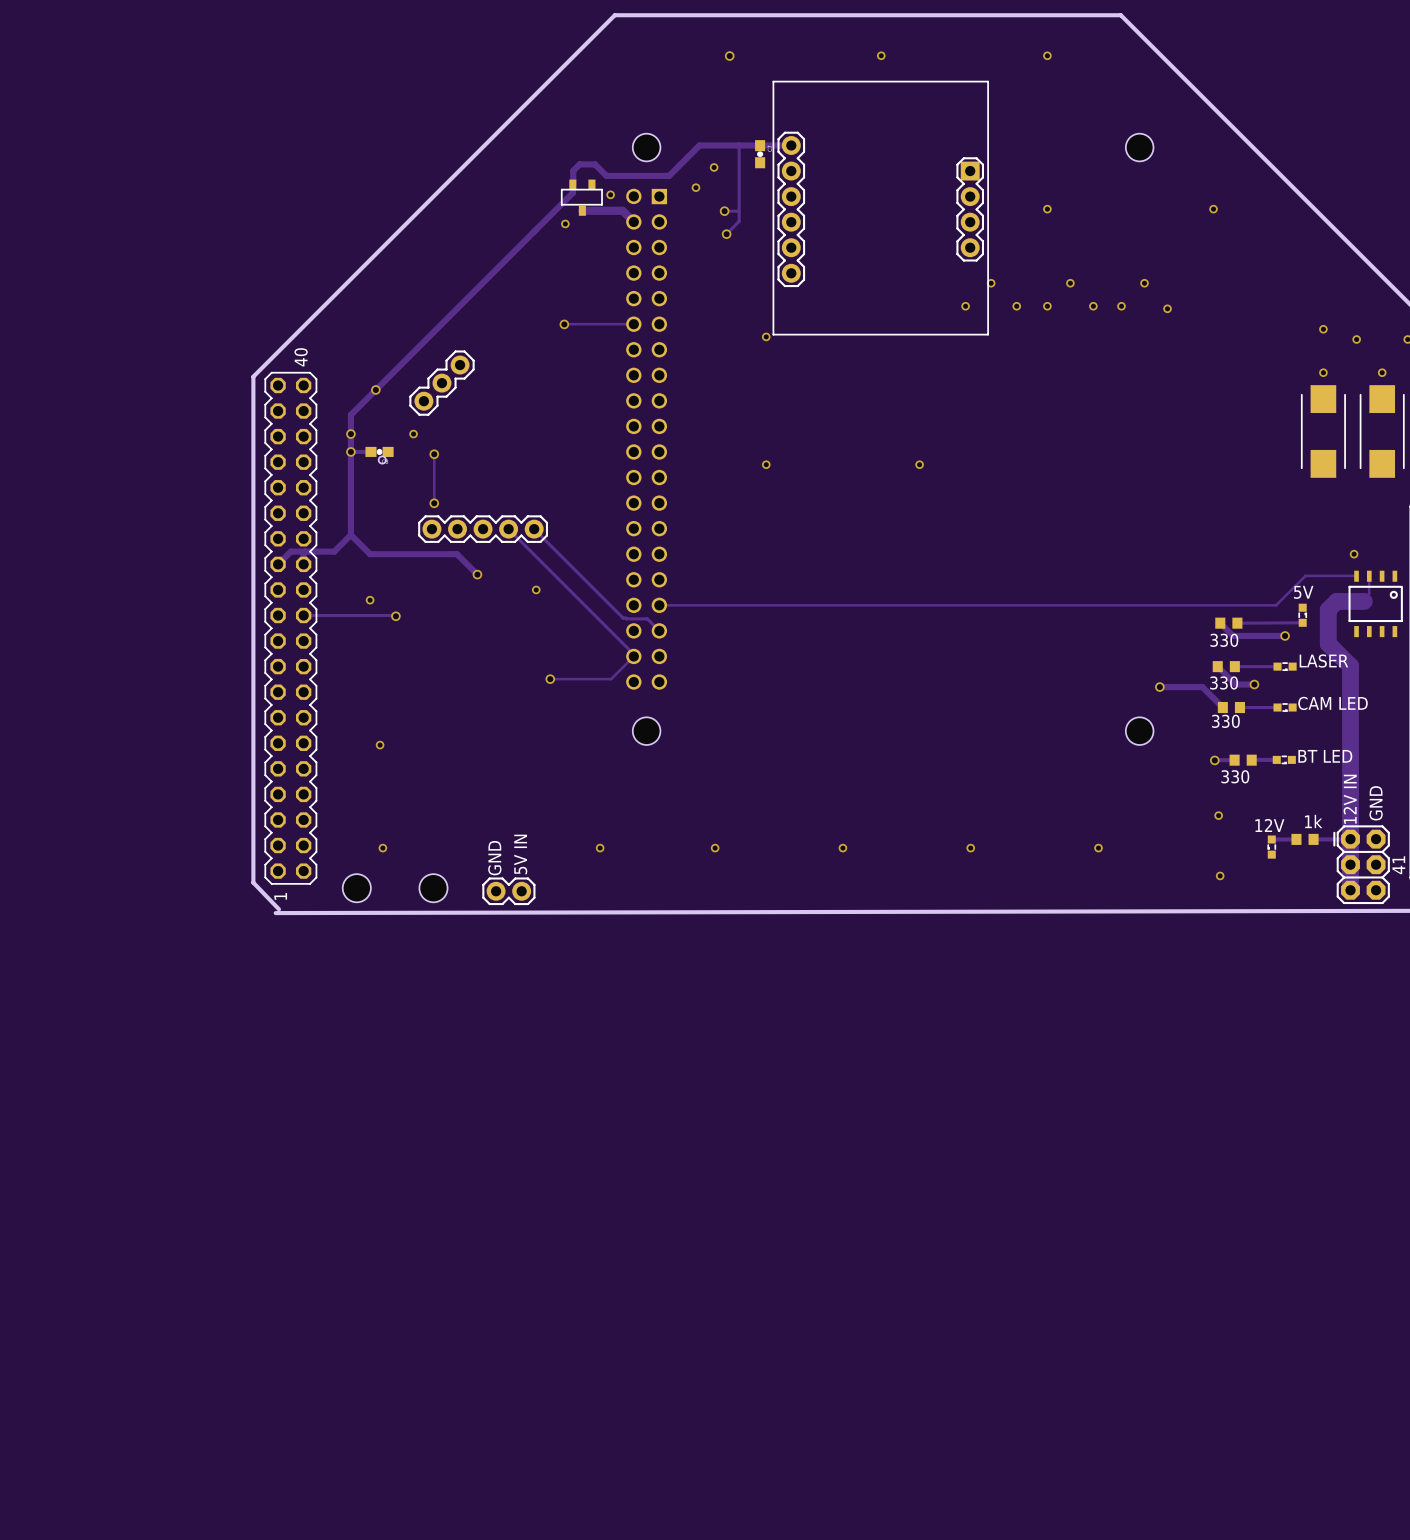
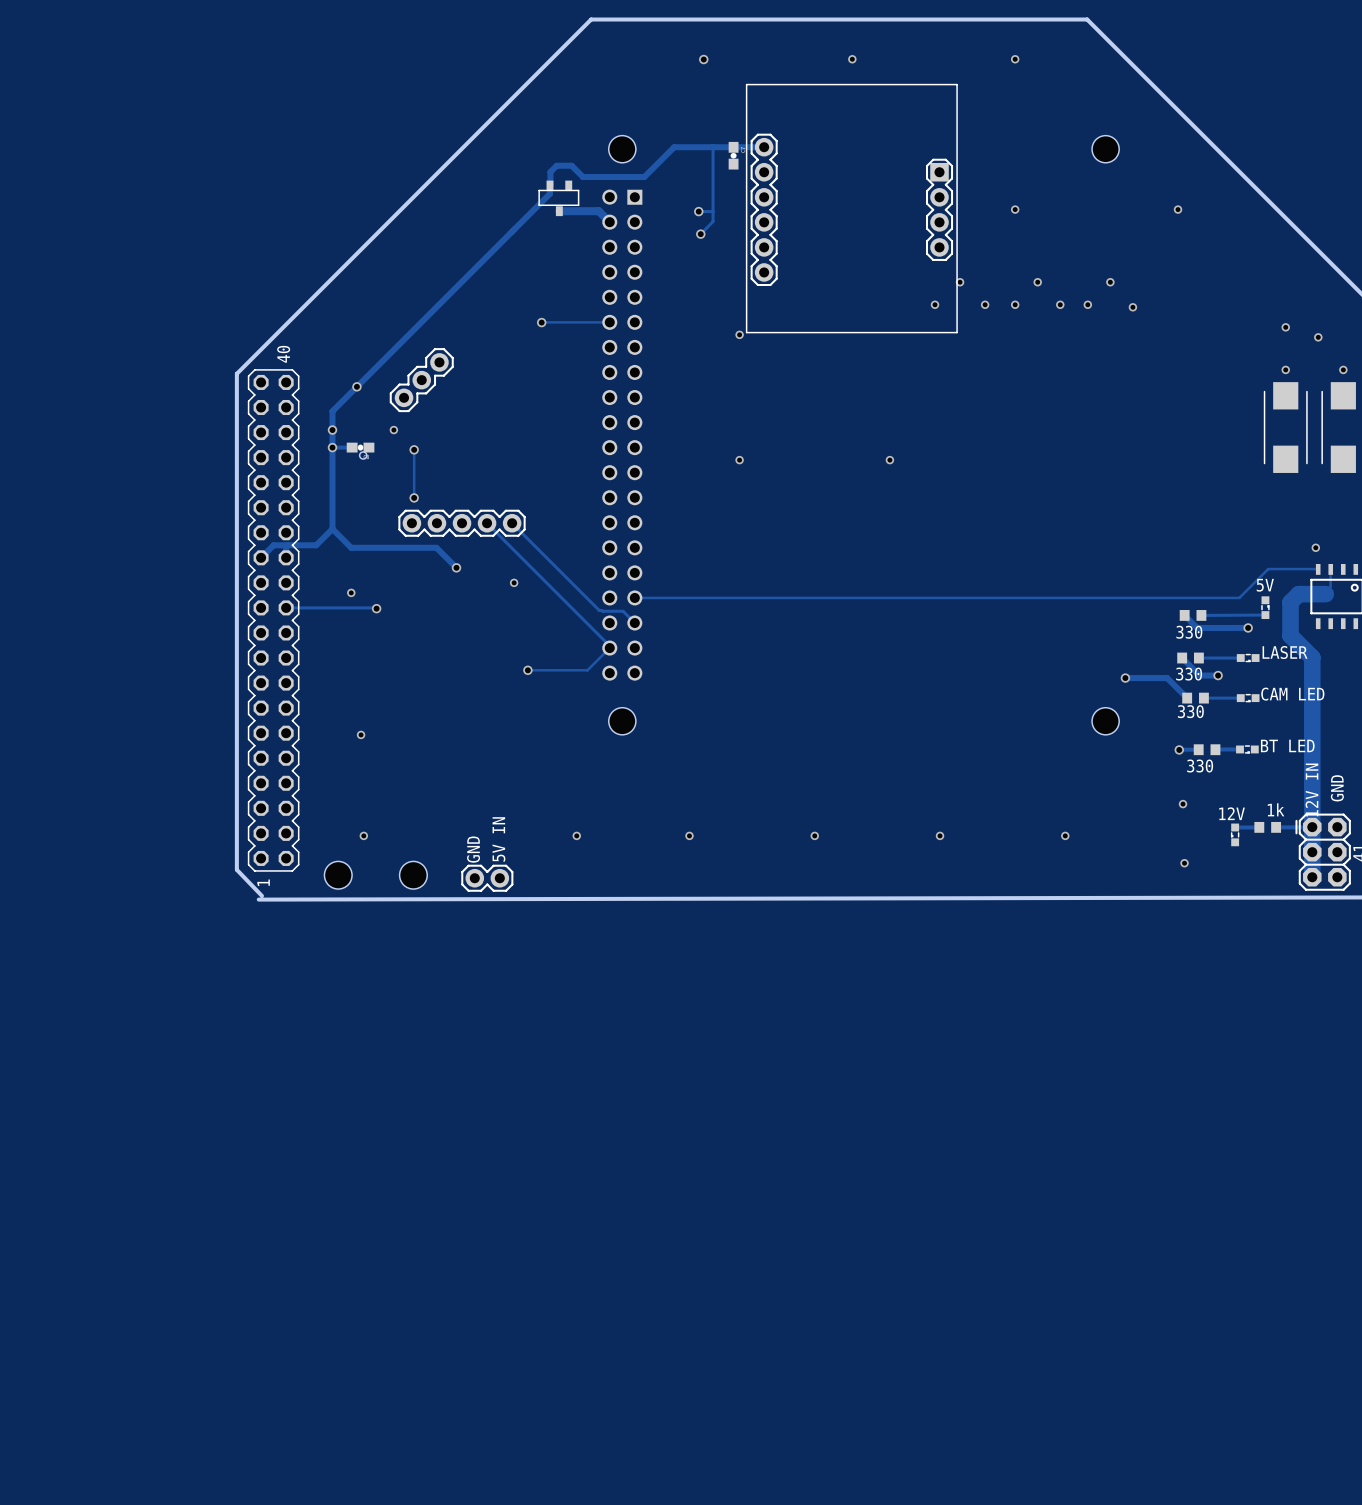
via: (714, 167) -> none
via: (695, 187) -> none
via: (610, 194) -> none
via: (565, 223) -> none

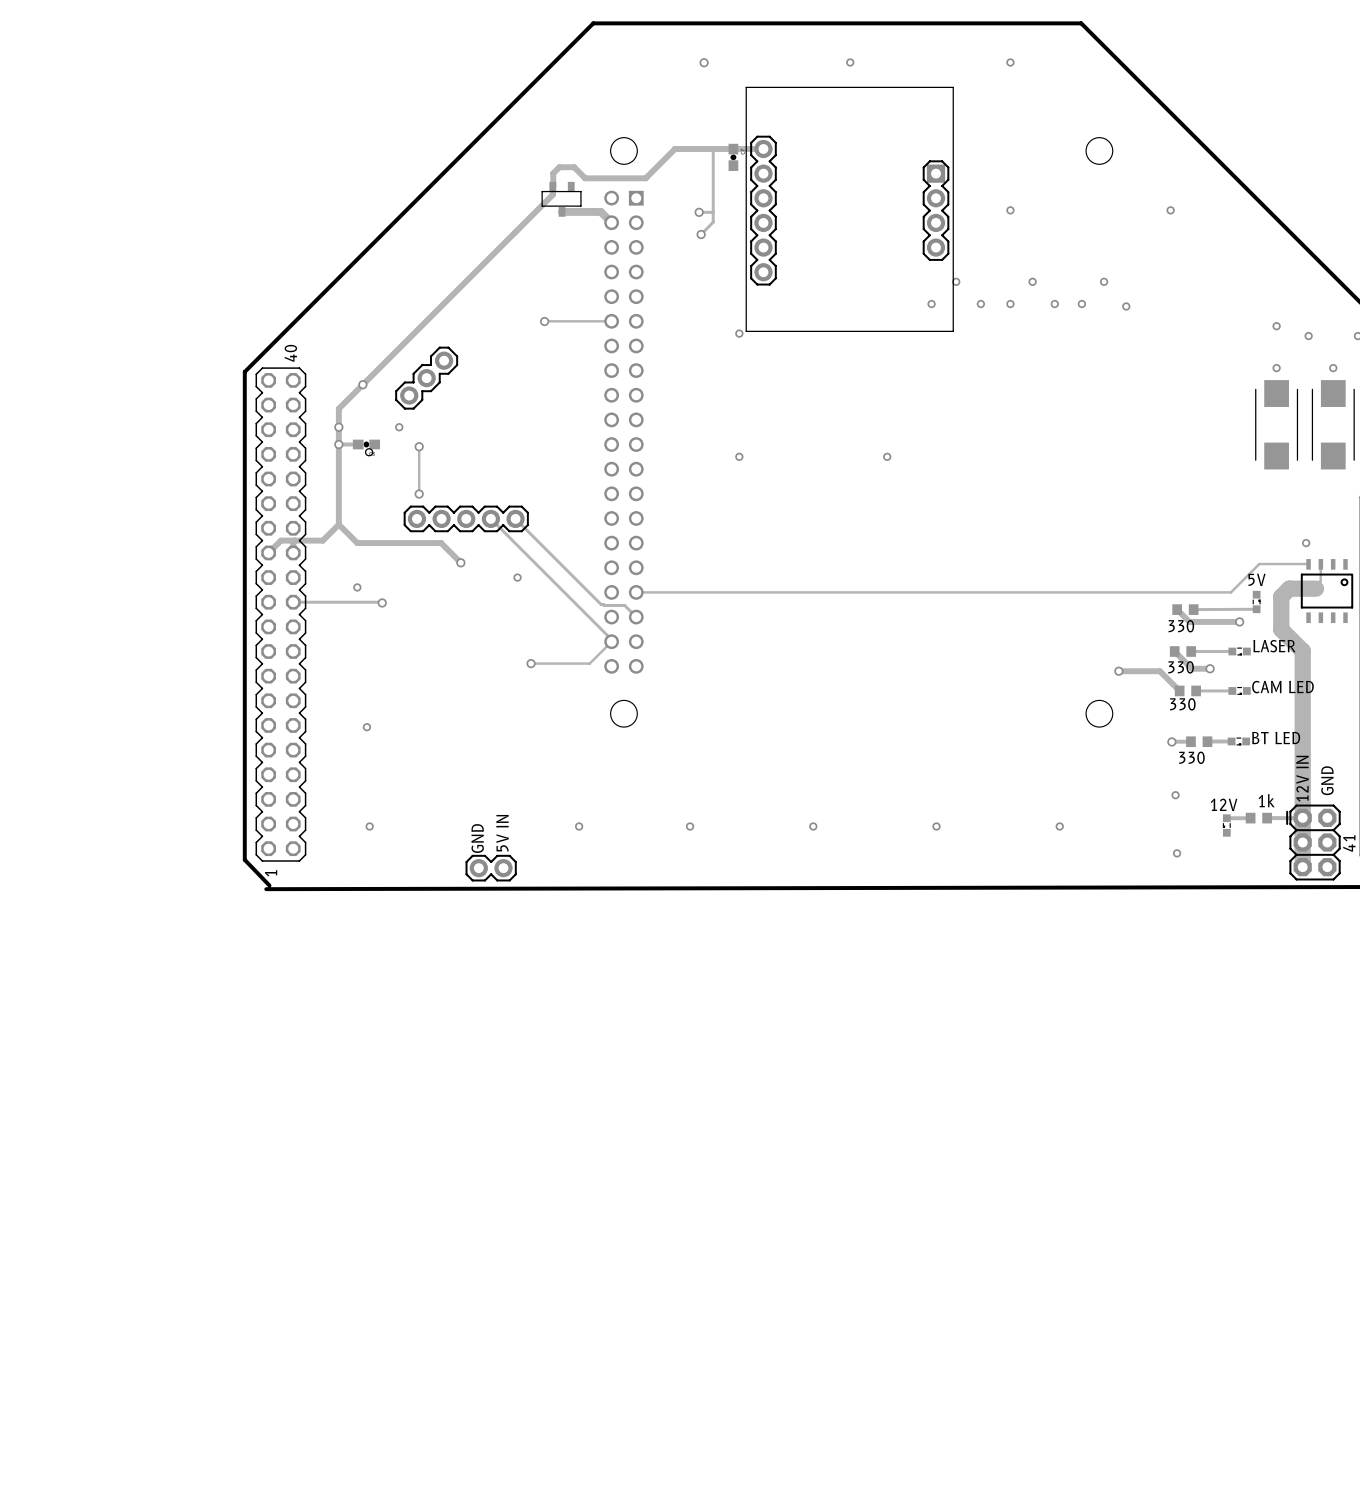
hole: (338, 875) -> none
hole: (413, 875) -> none

